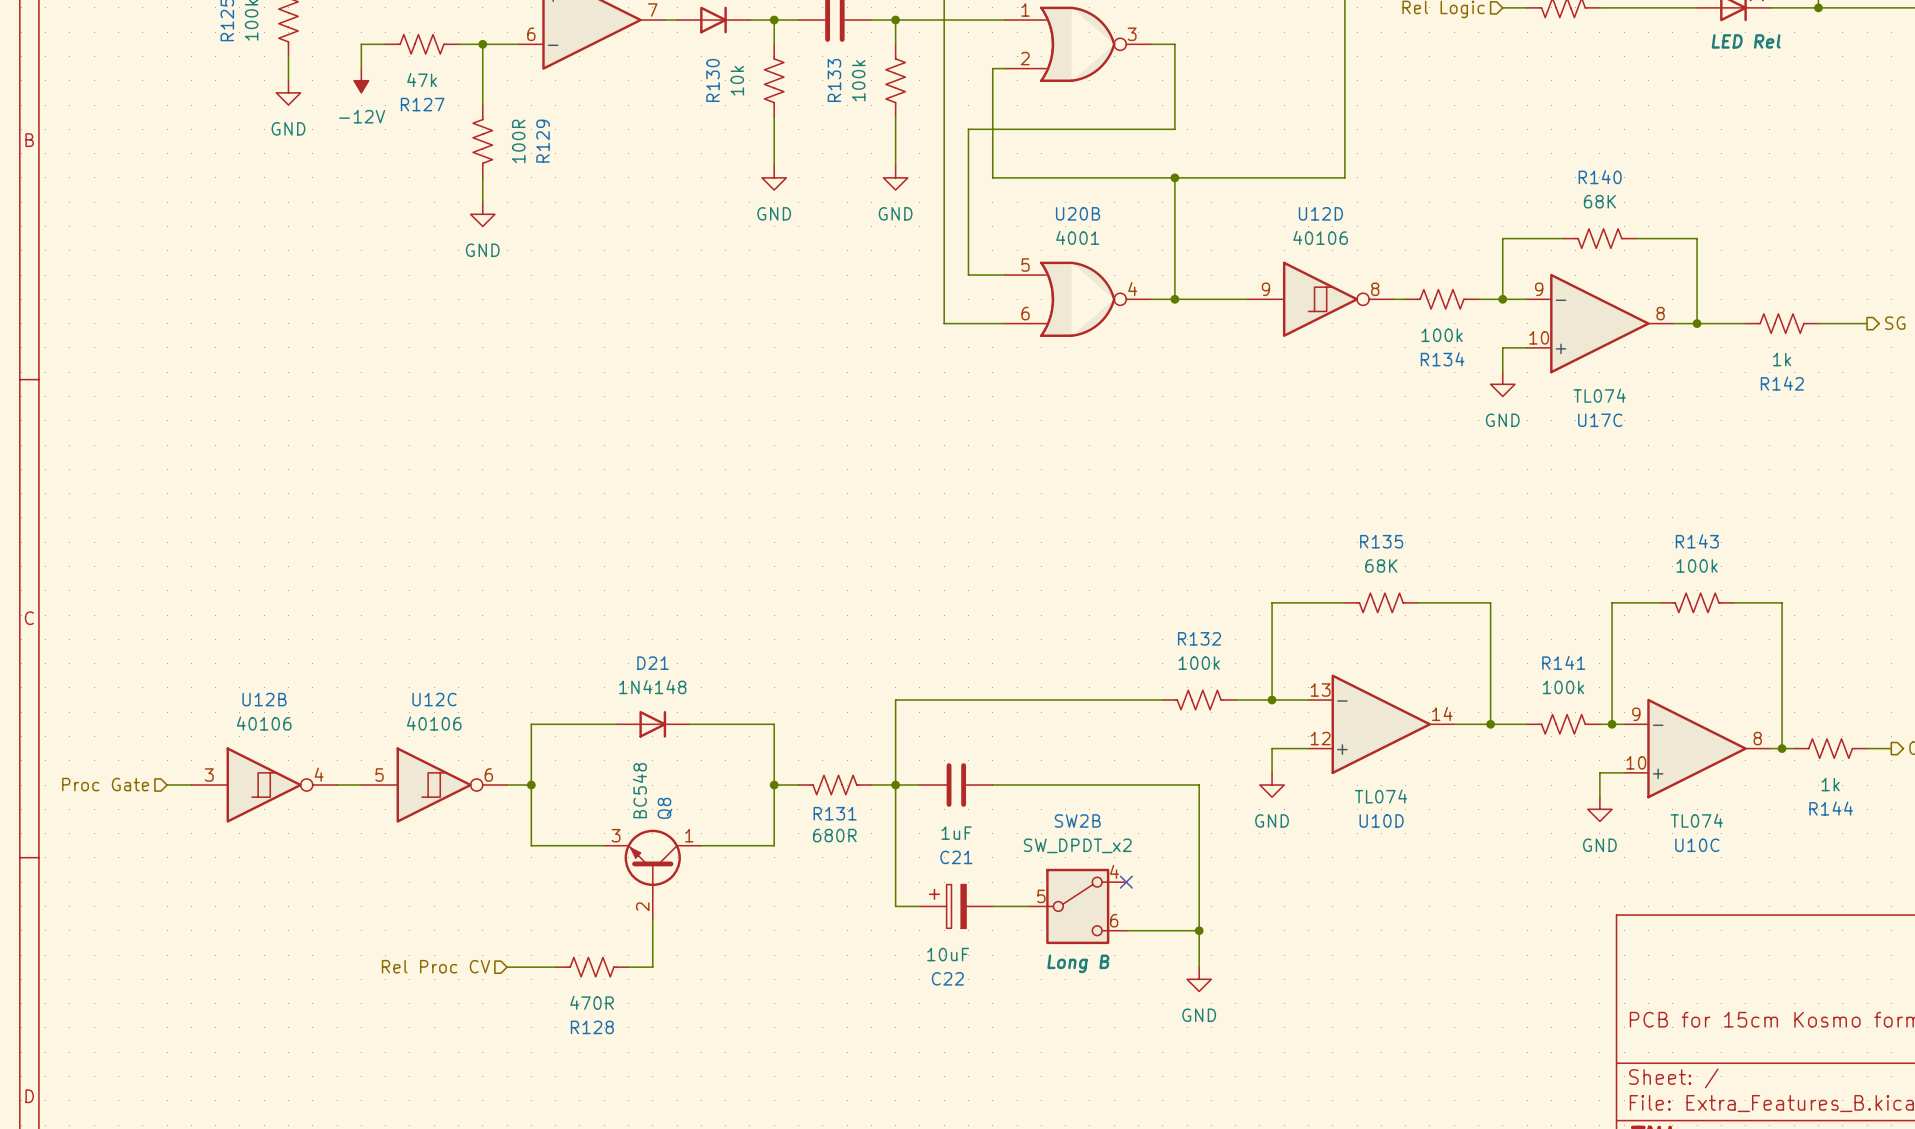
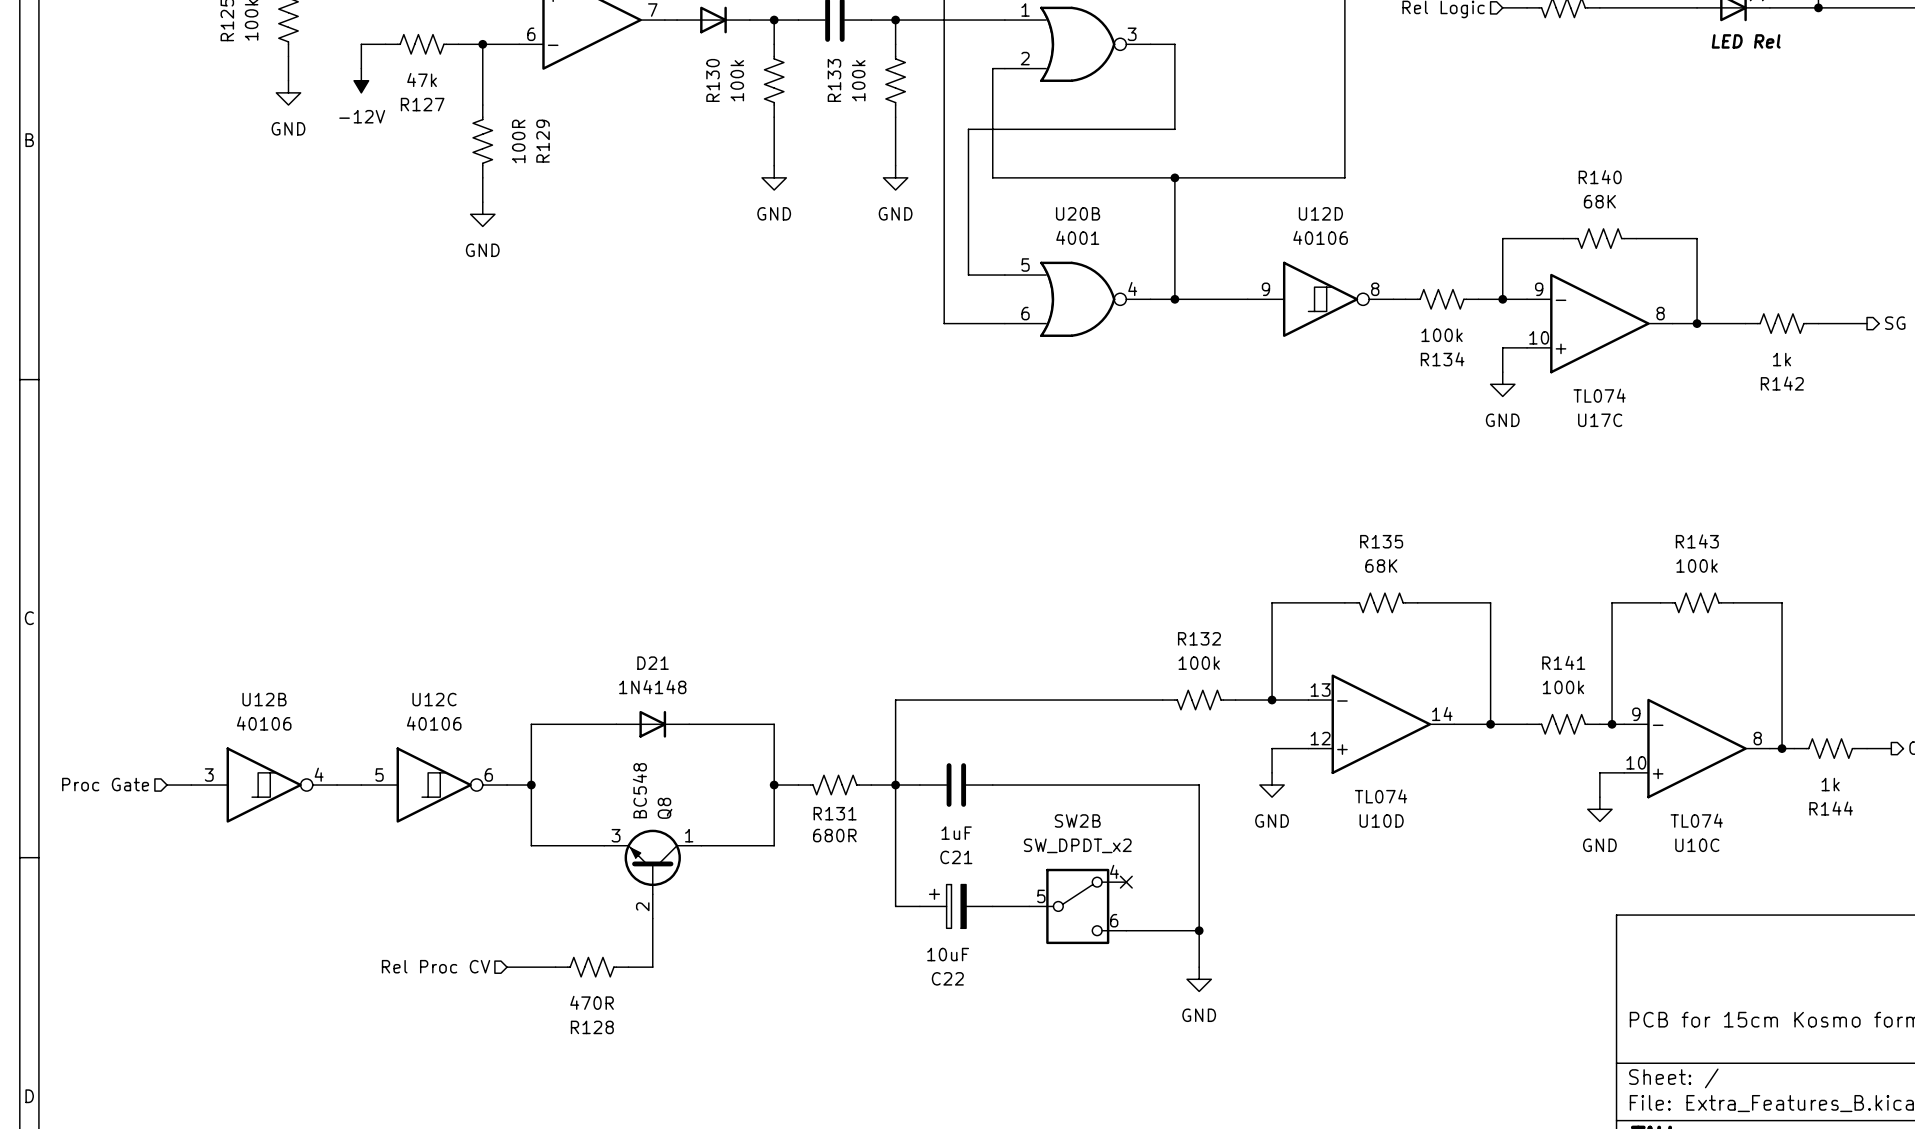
R130 value: 10k (737, 80) -> 100k (737, 80)
SW2B text: Long B (1078, 963) -> none

